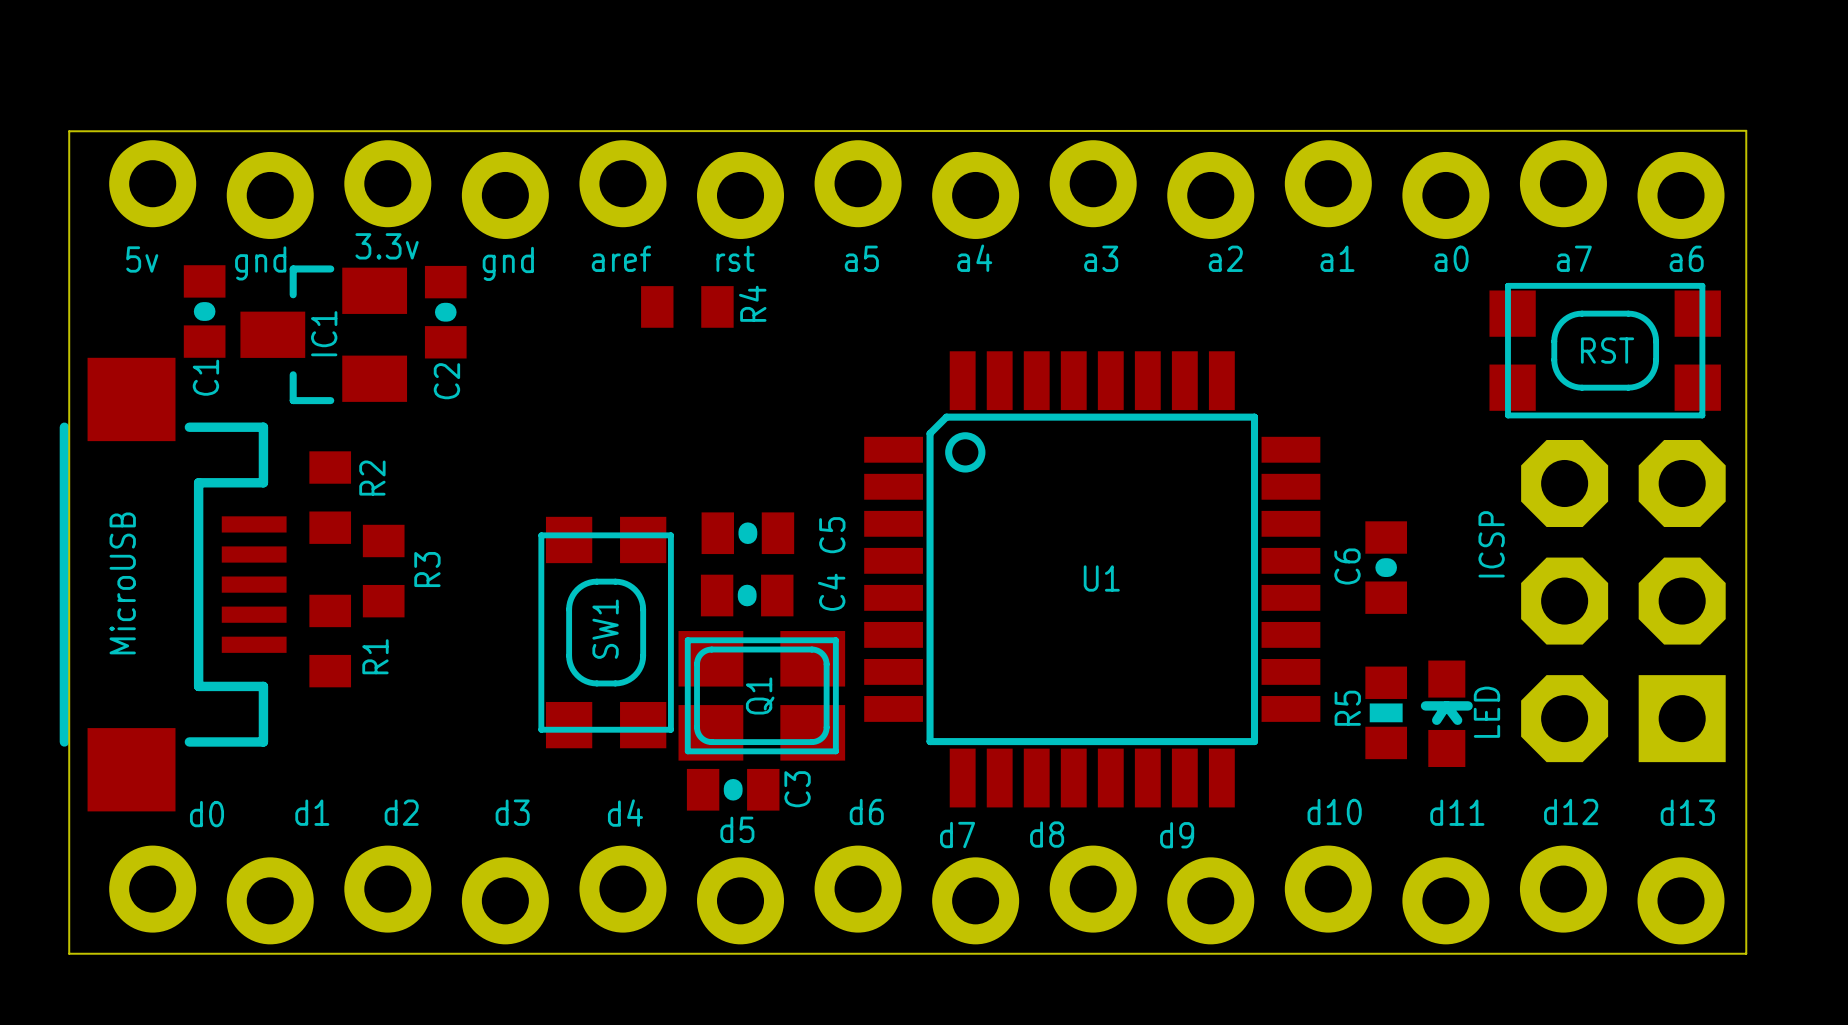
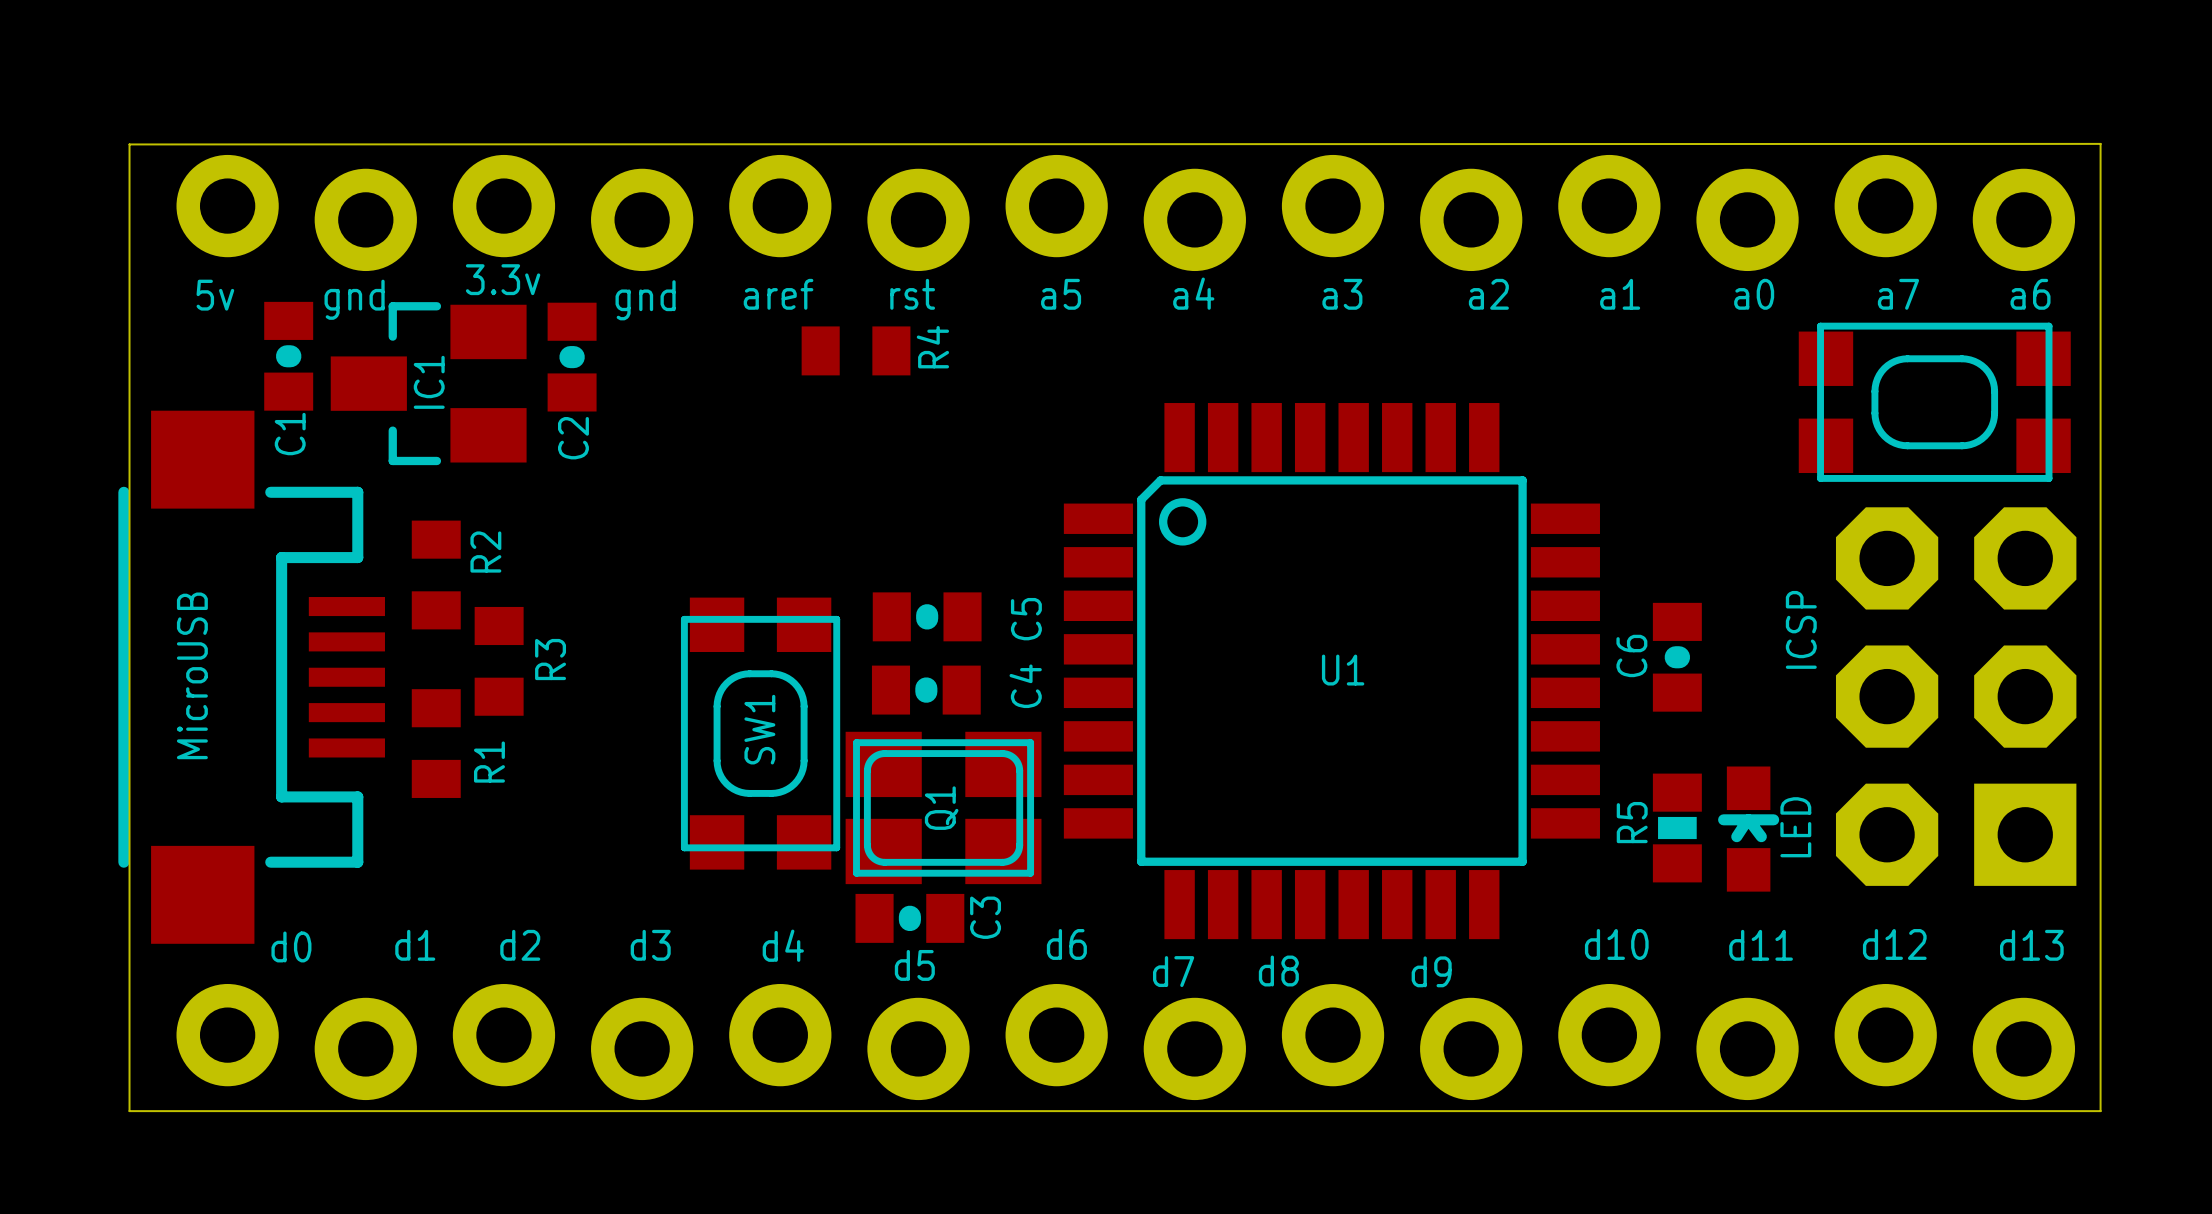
text: RST (1607, 350) -> none

